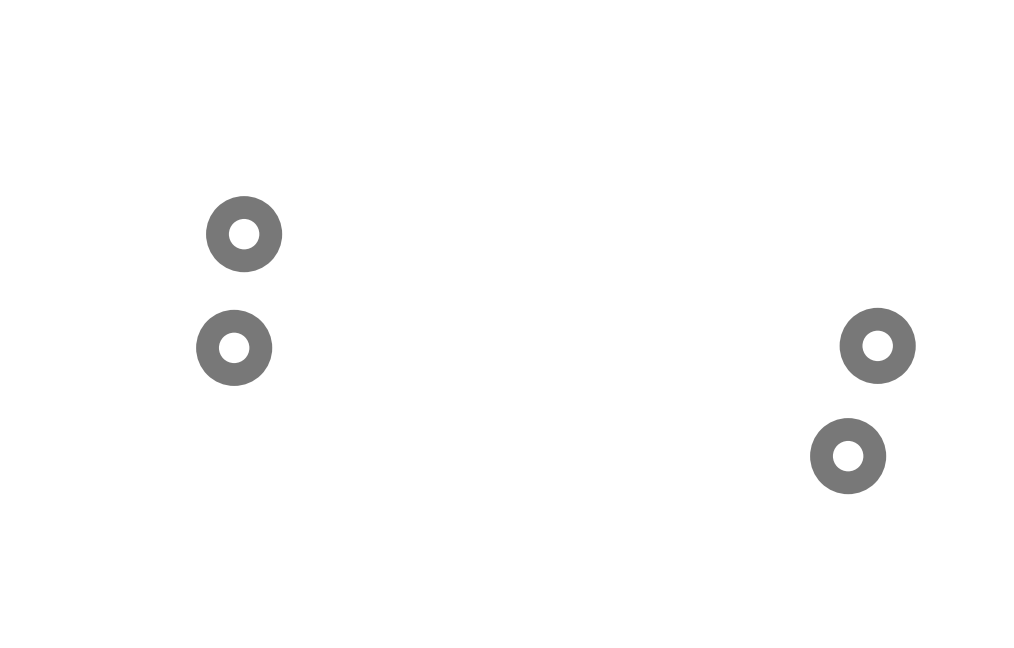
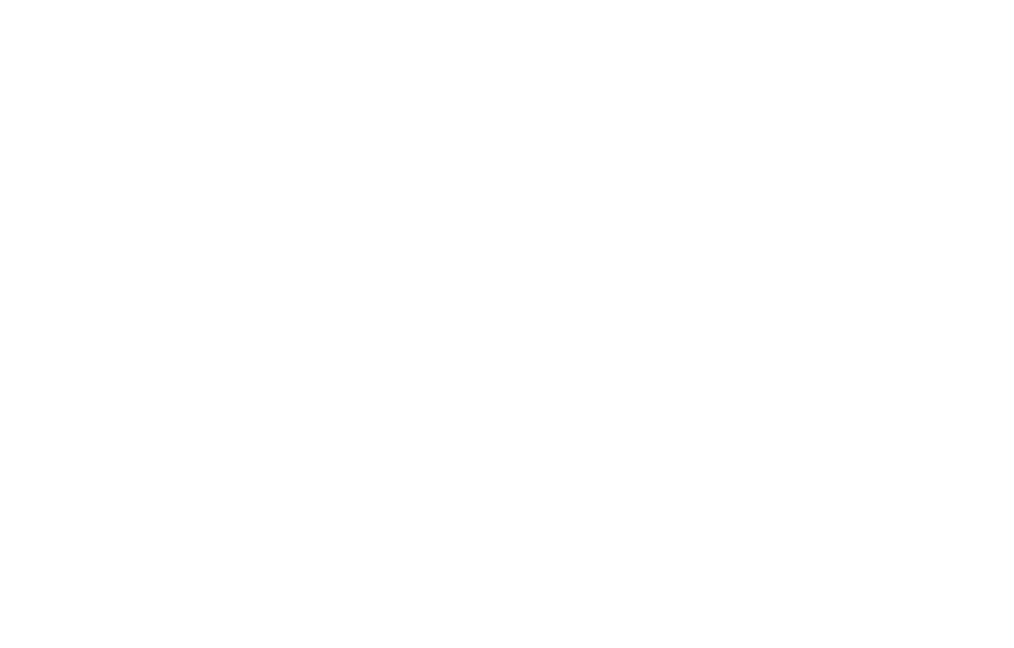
via: (244, 234) -> none
via: (877, 345) -> none
via: (234, 347) -> none
via: (848, 456) -> none

